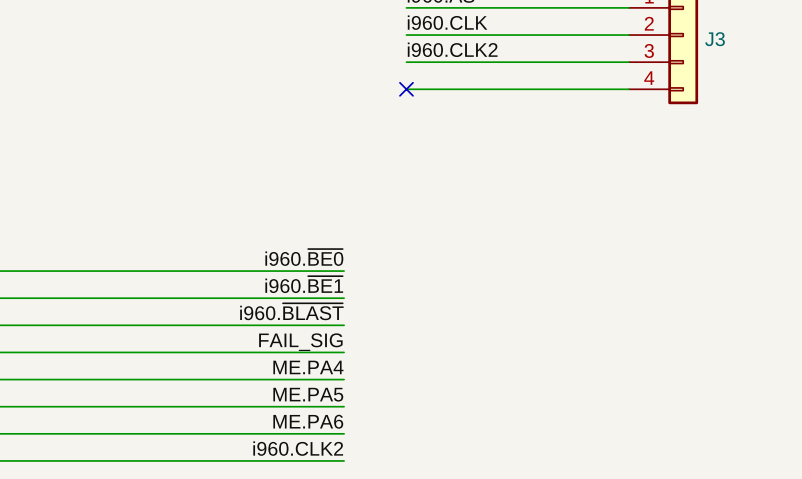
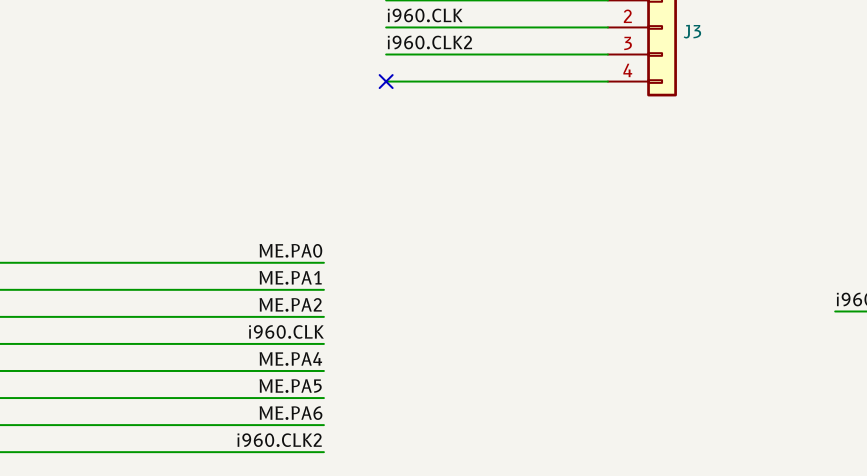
label: i960.~{BE0} (304, 257) -> ME.PA0 (290, 250)
label: i960.~{BE1} (304, 284) -> ME.PA1 (290, 277)
label: i960.~{BLAST} (291, 311) -> ME.PA2 (290, 304)
label: FAIL_SIG (300, 342) -> i960.CLK (286, 331)

